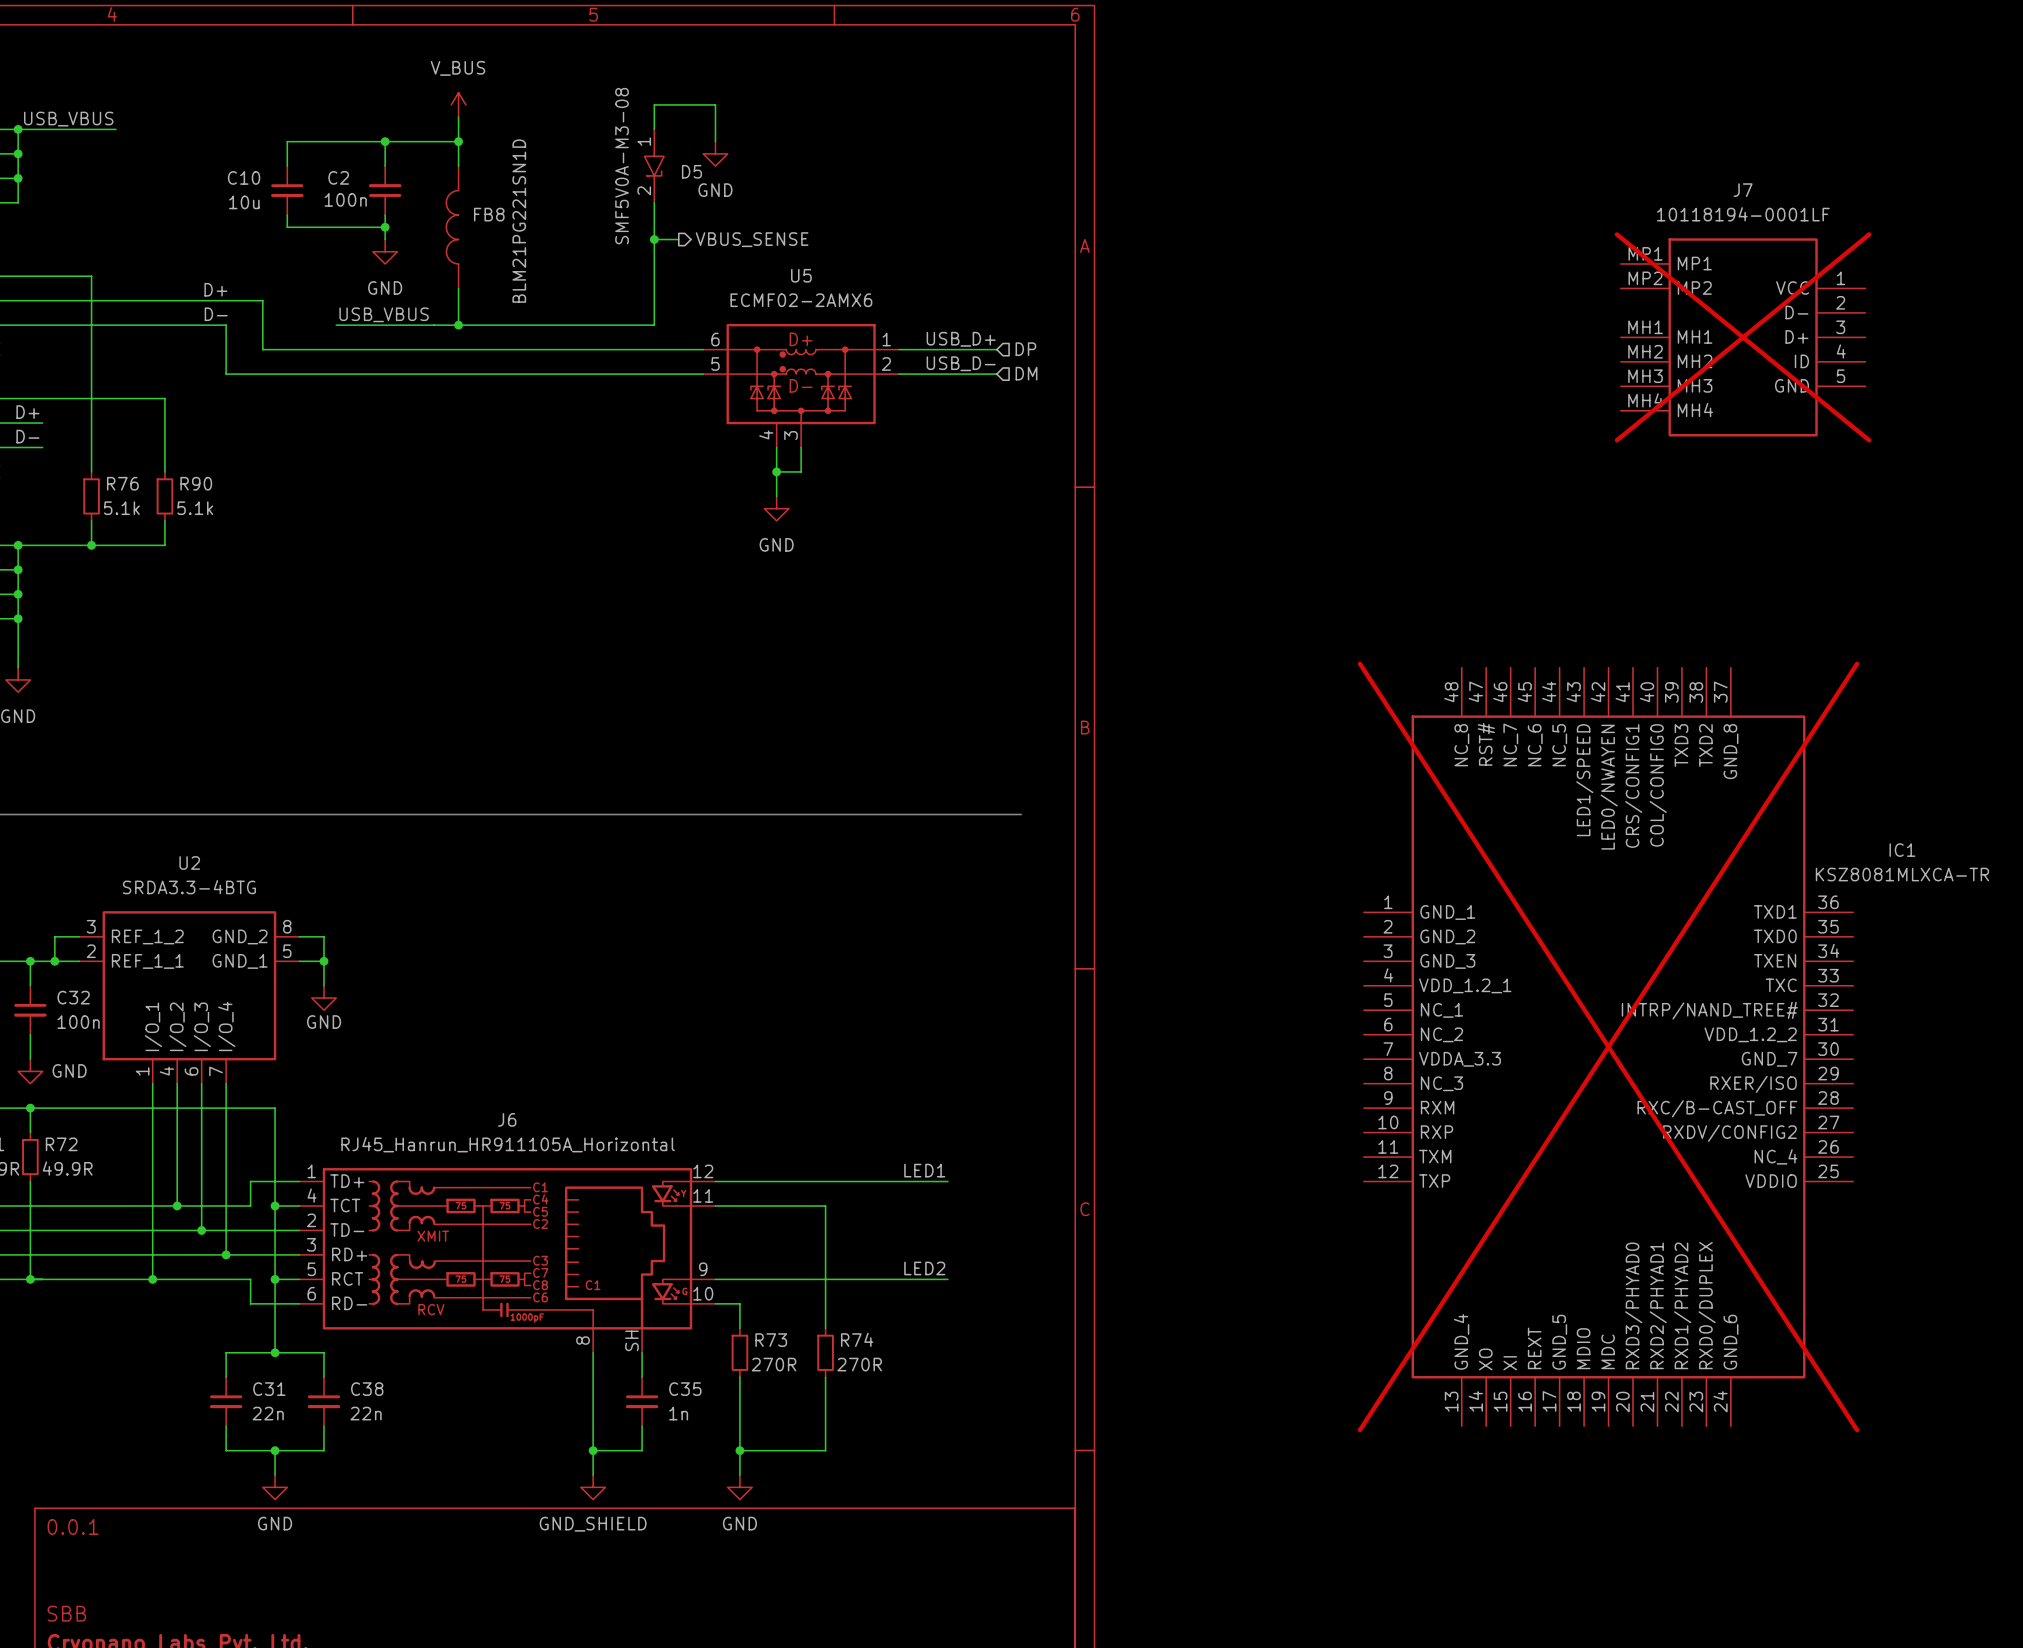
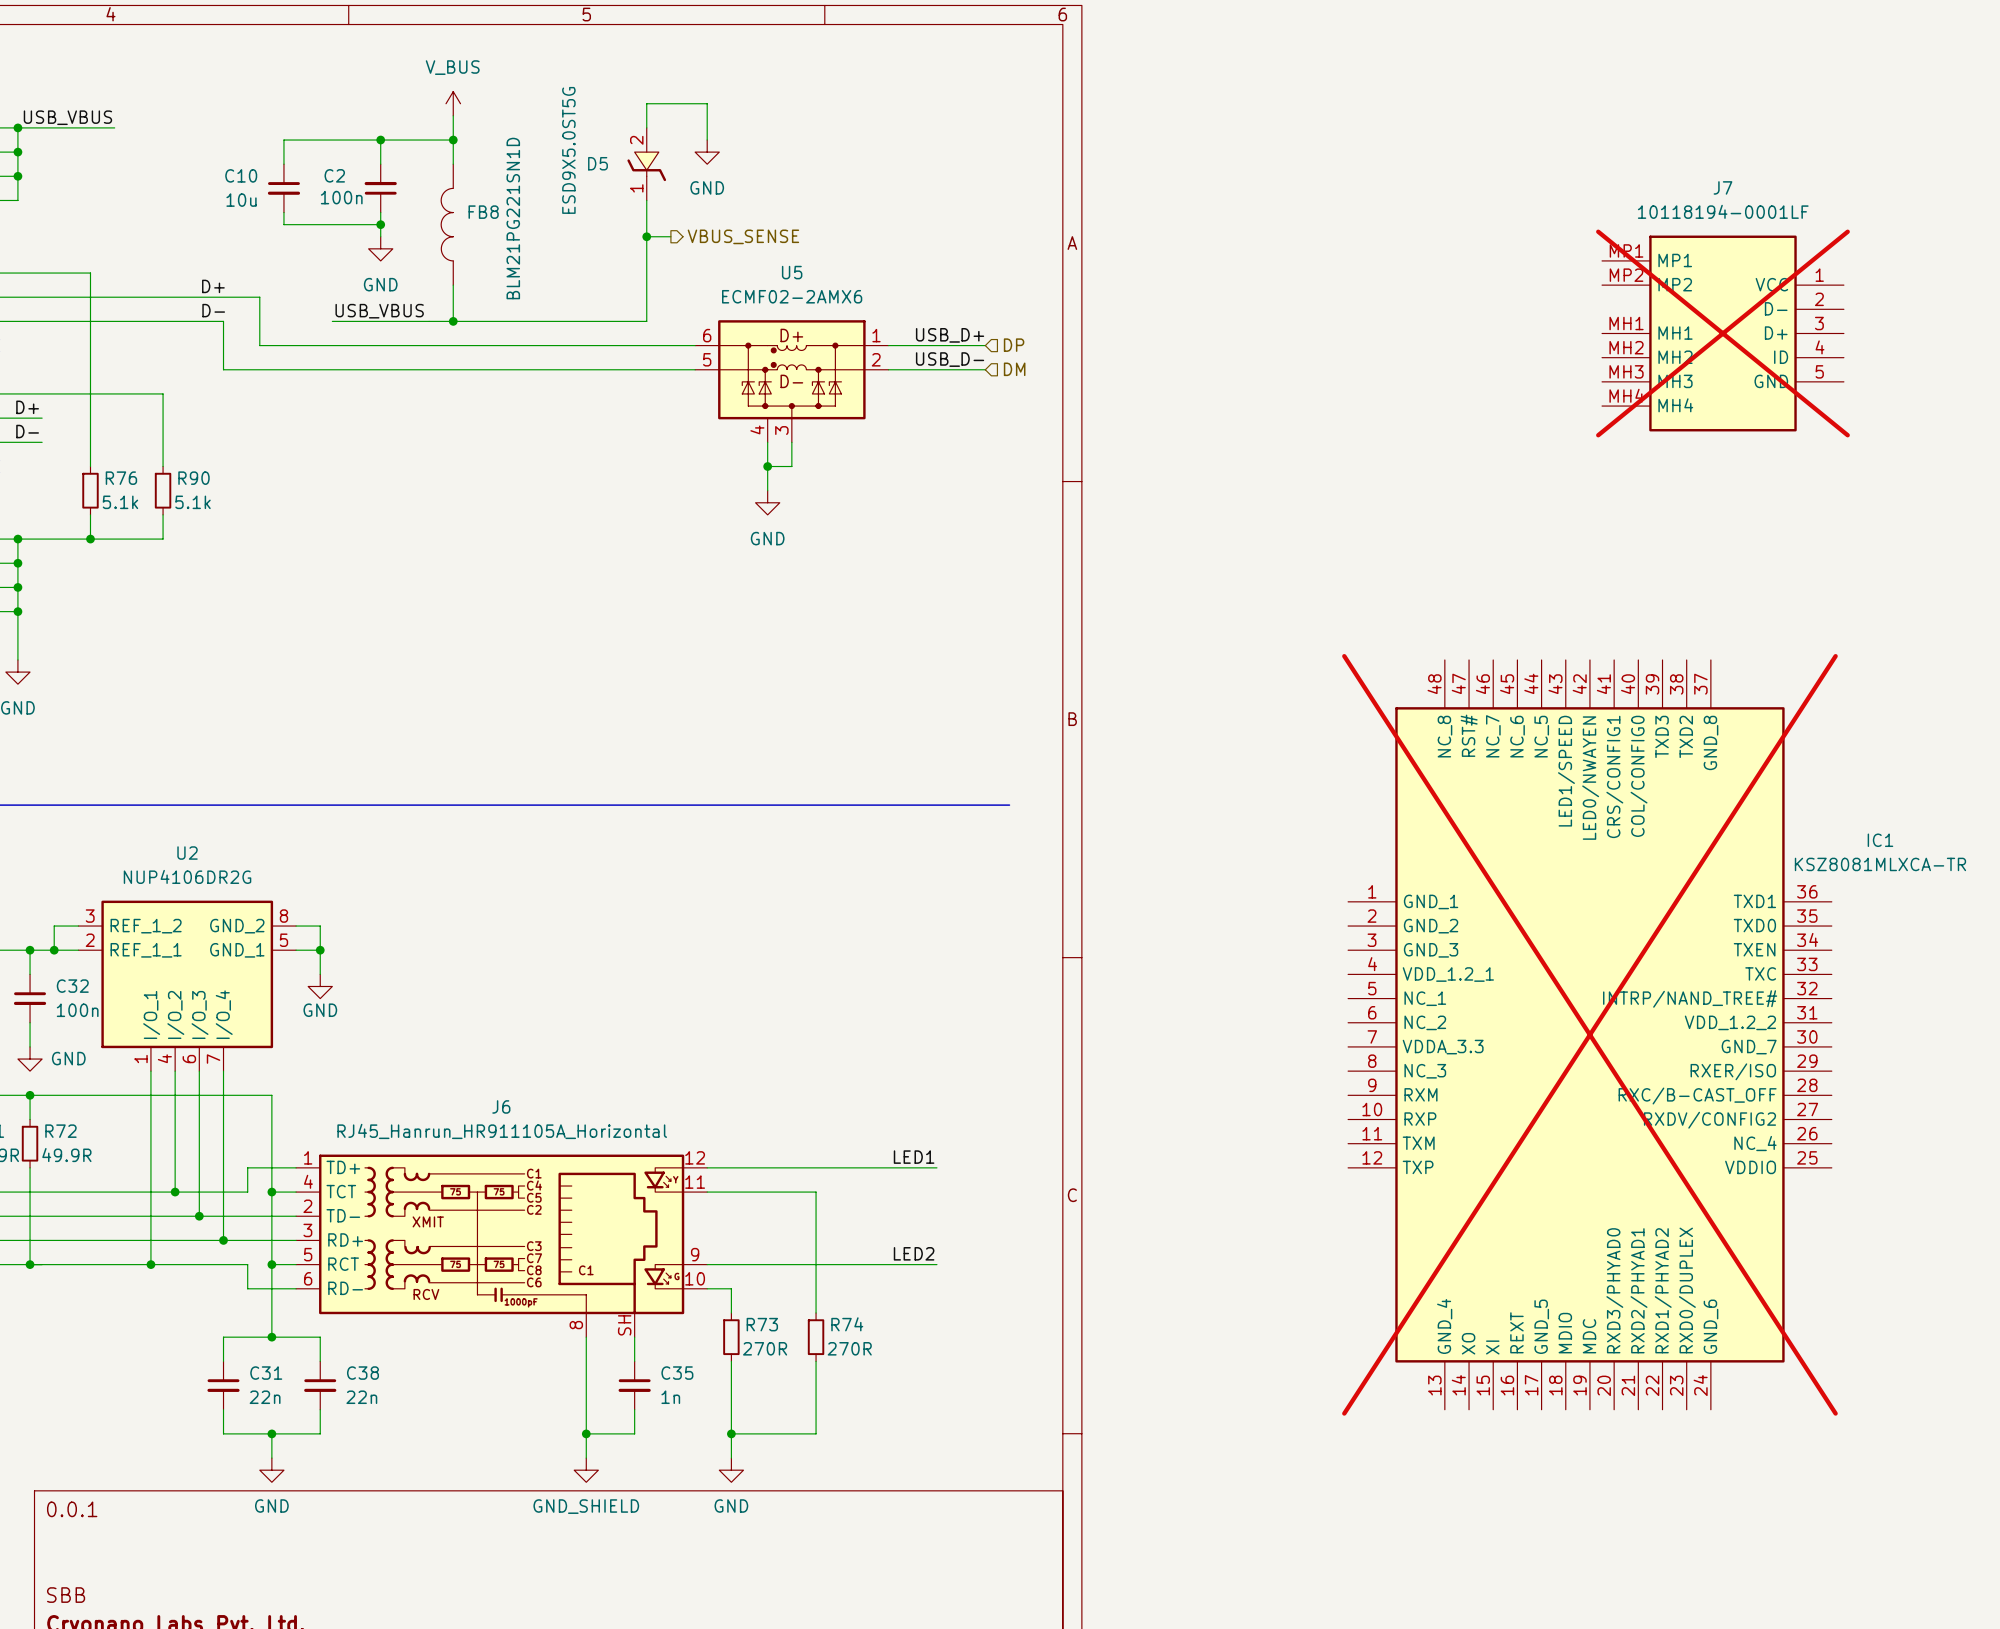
D5 symbol: [644, 129, 665, 203] -> [627, 127, 667, 201]
D5 value: SMF5V0A-M3-08 (622, 166) -> ESD9X5.0ST5G (568, 150)
D5 name position: D5 (691, 171) -> D5 (597, 163)
U2 value: SRDA3.3-4BTG (189, 887) -> NUP4106DR2G (187, 876)

